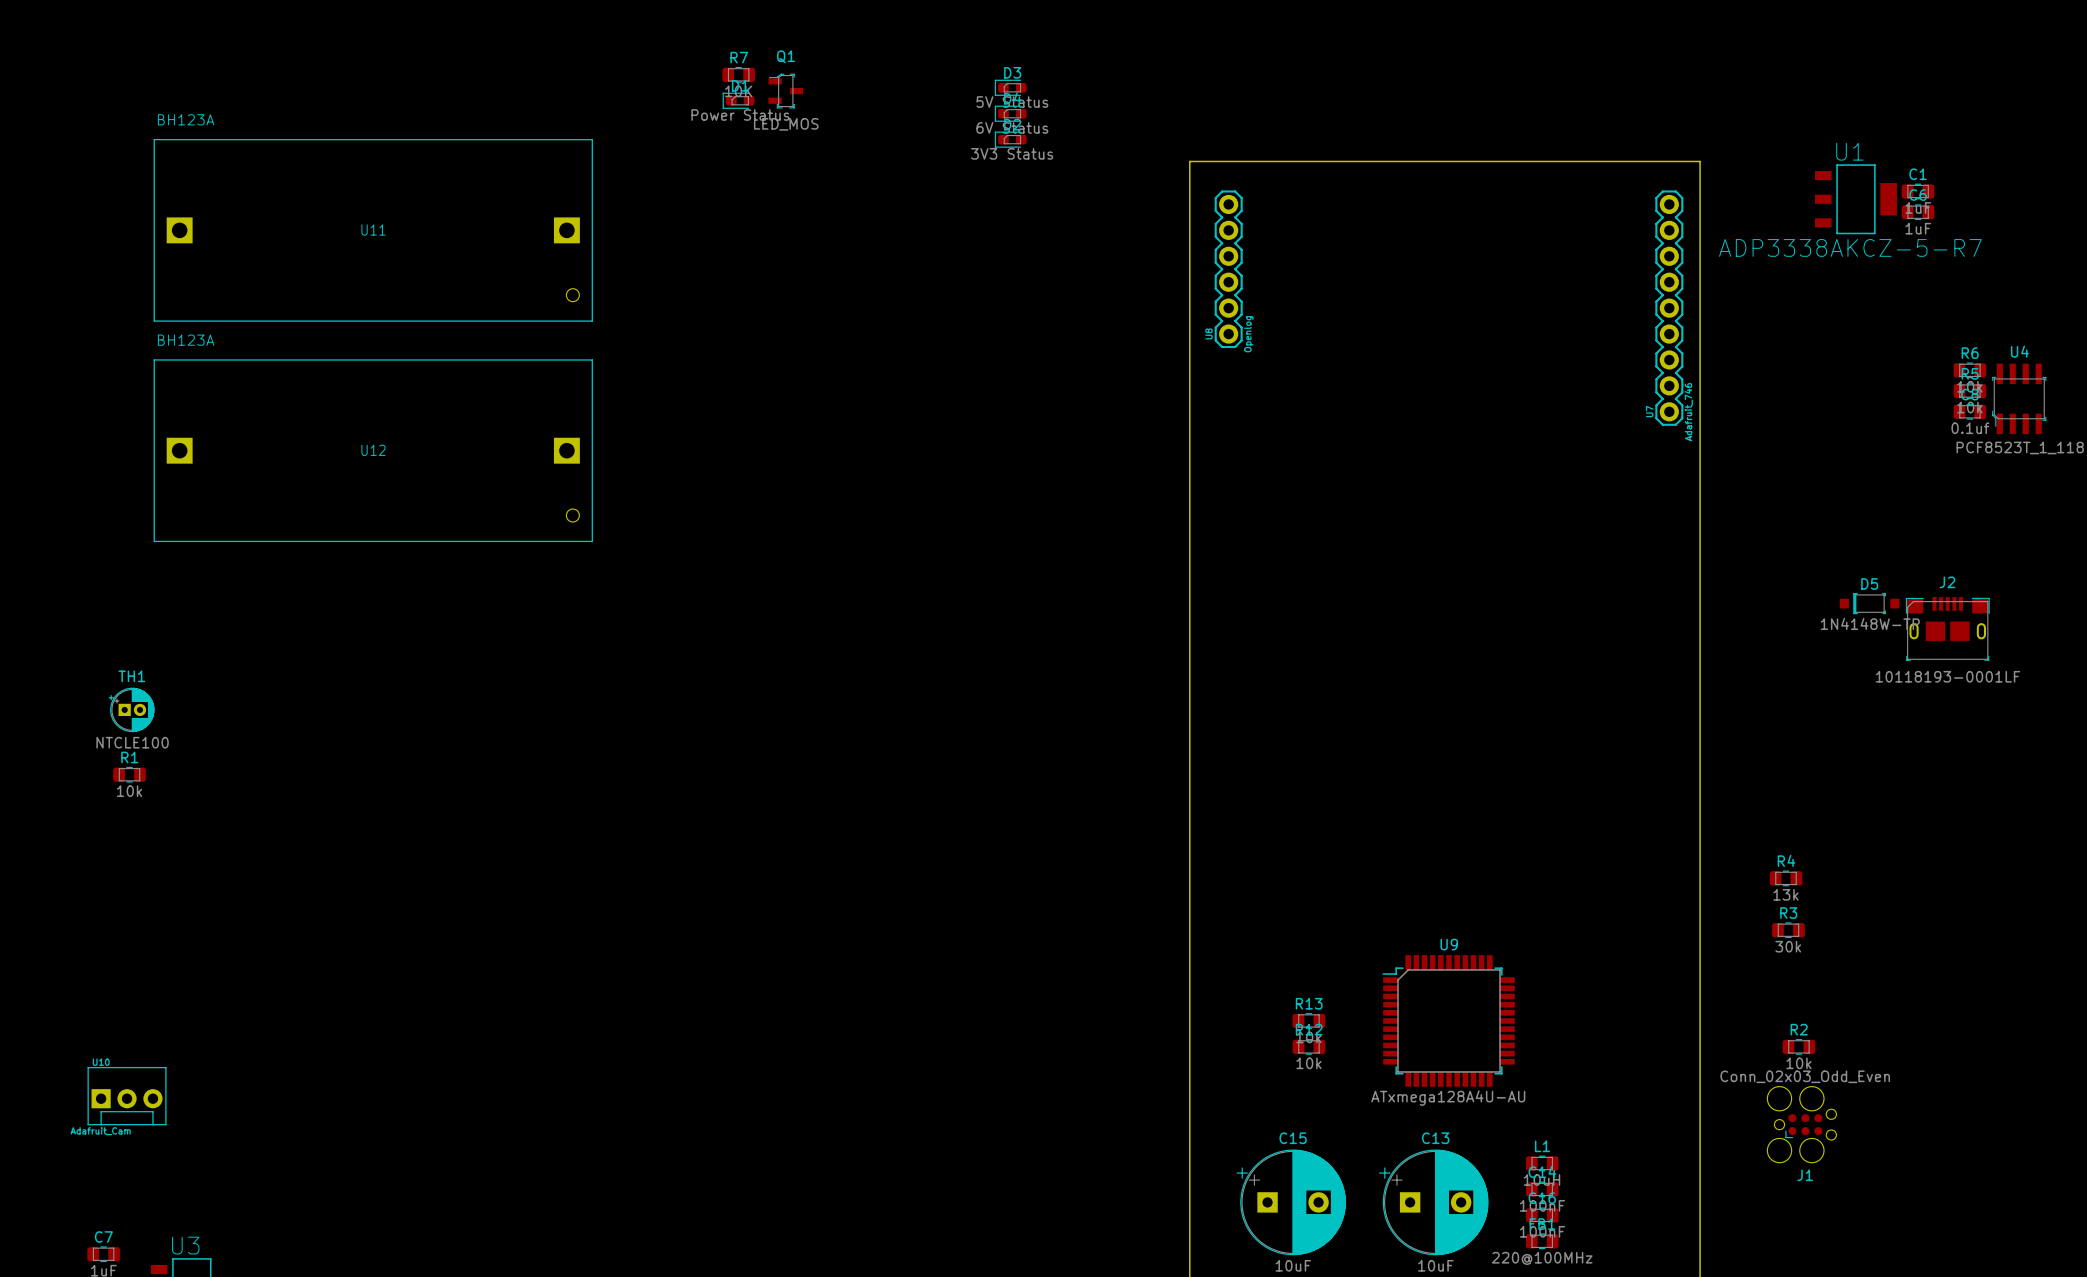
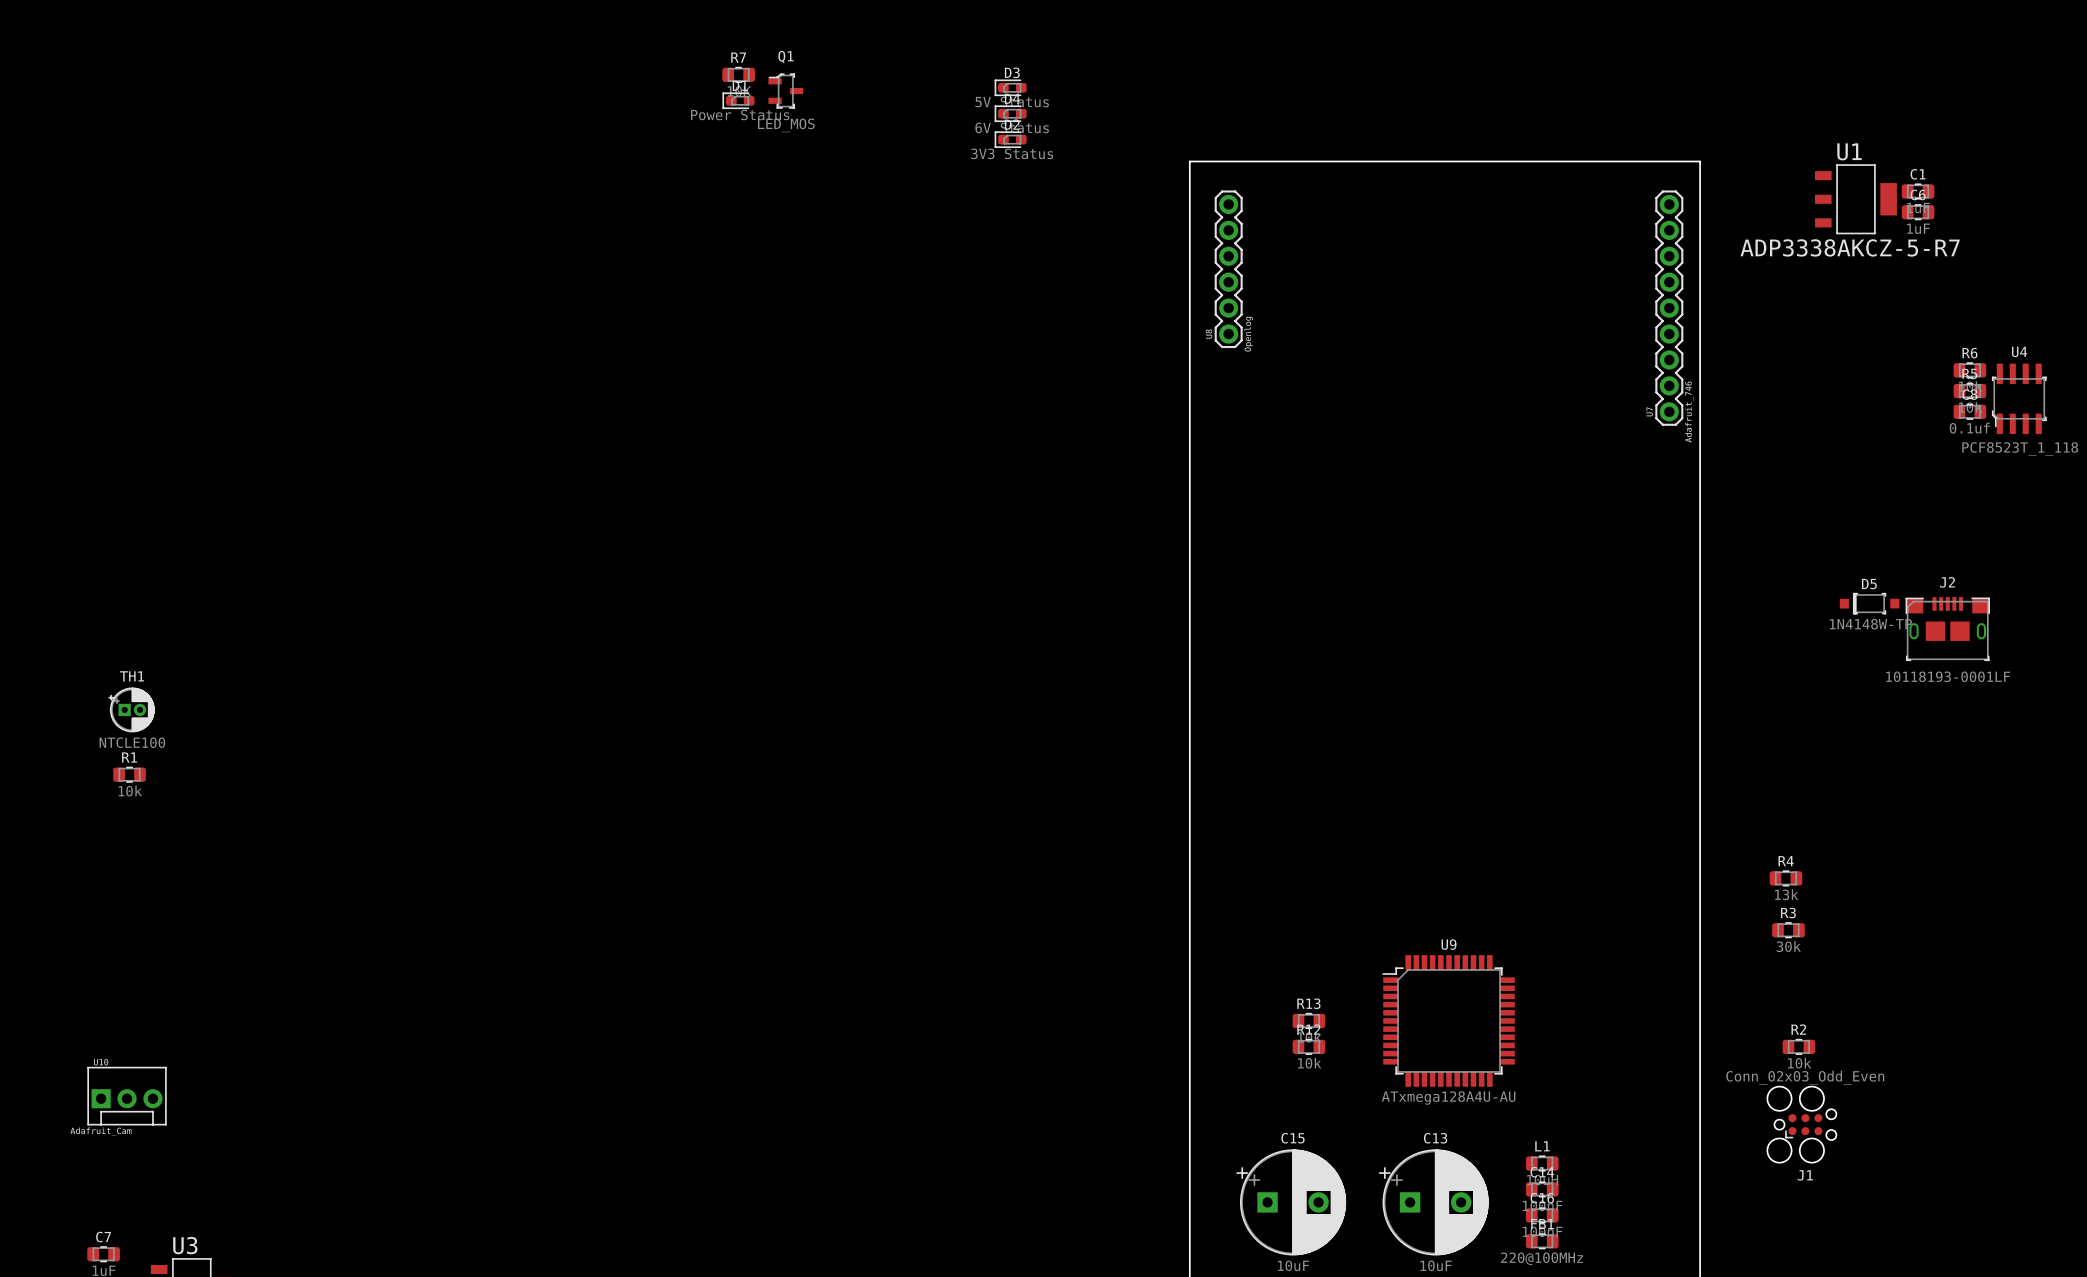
U11: BH123A (373, 230) -> none
U12: BH123A (373, 450) -> none

